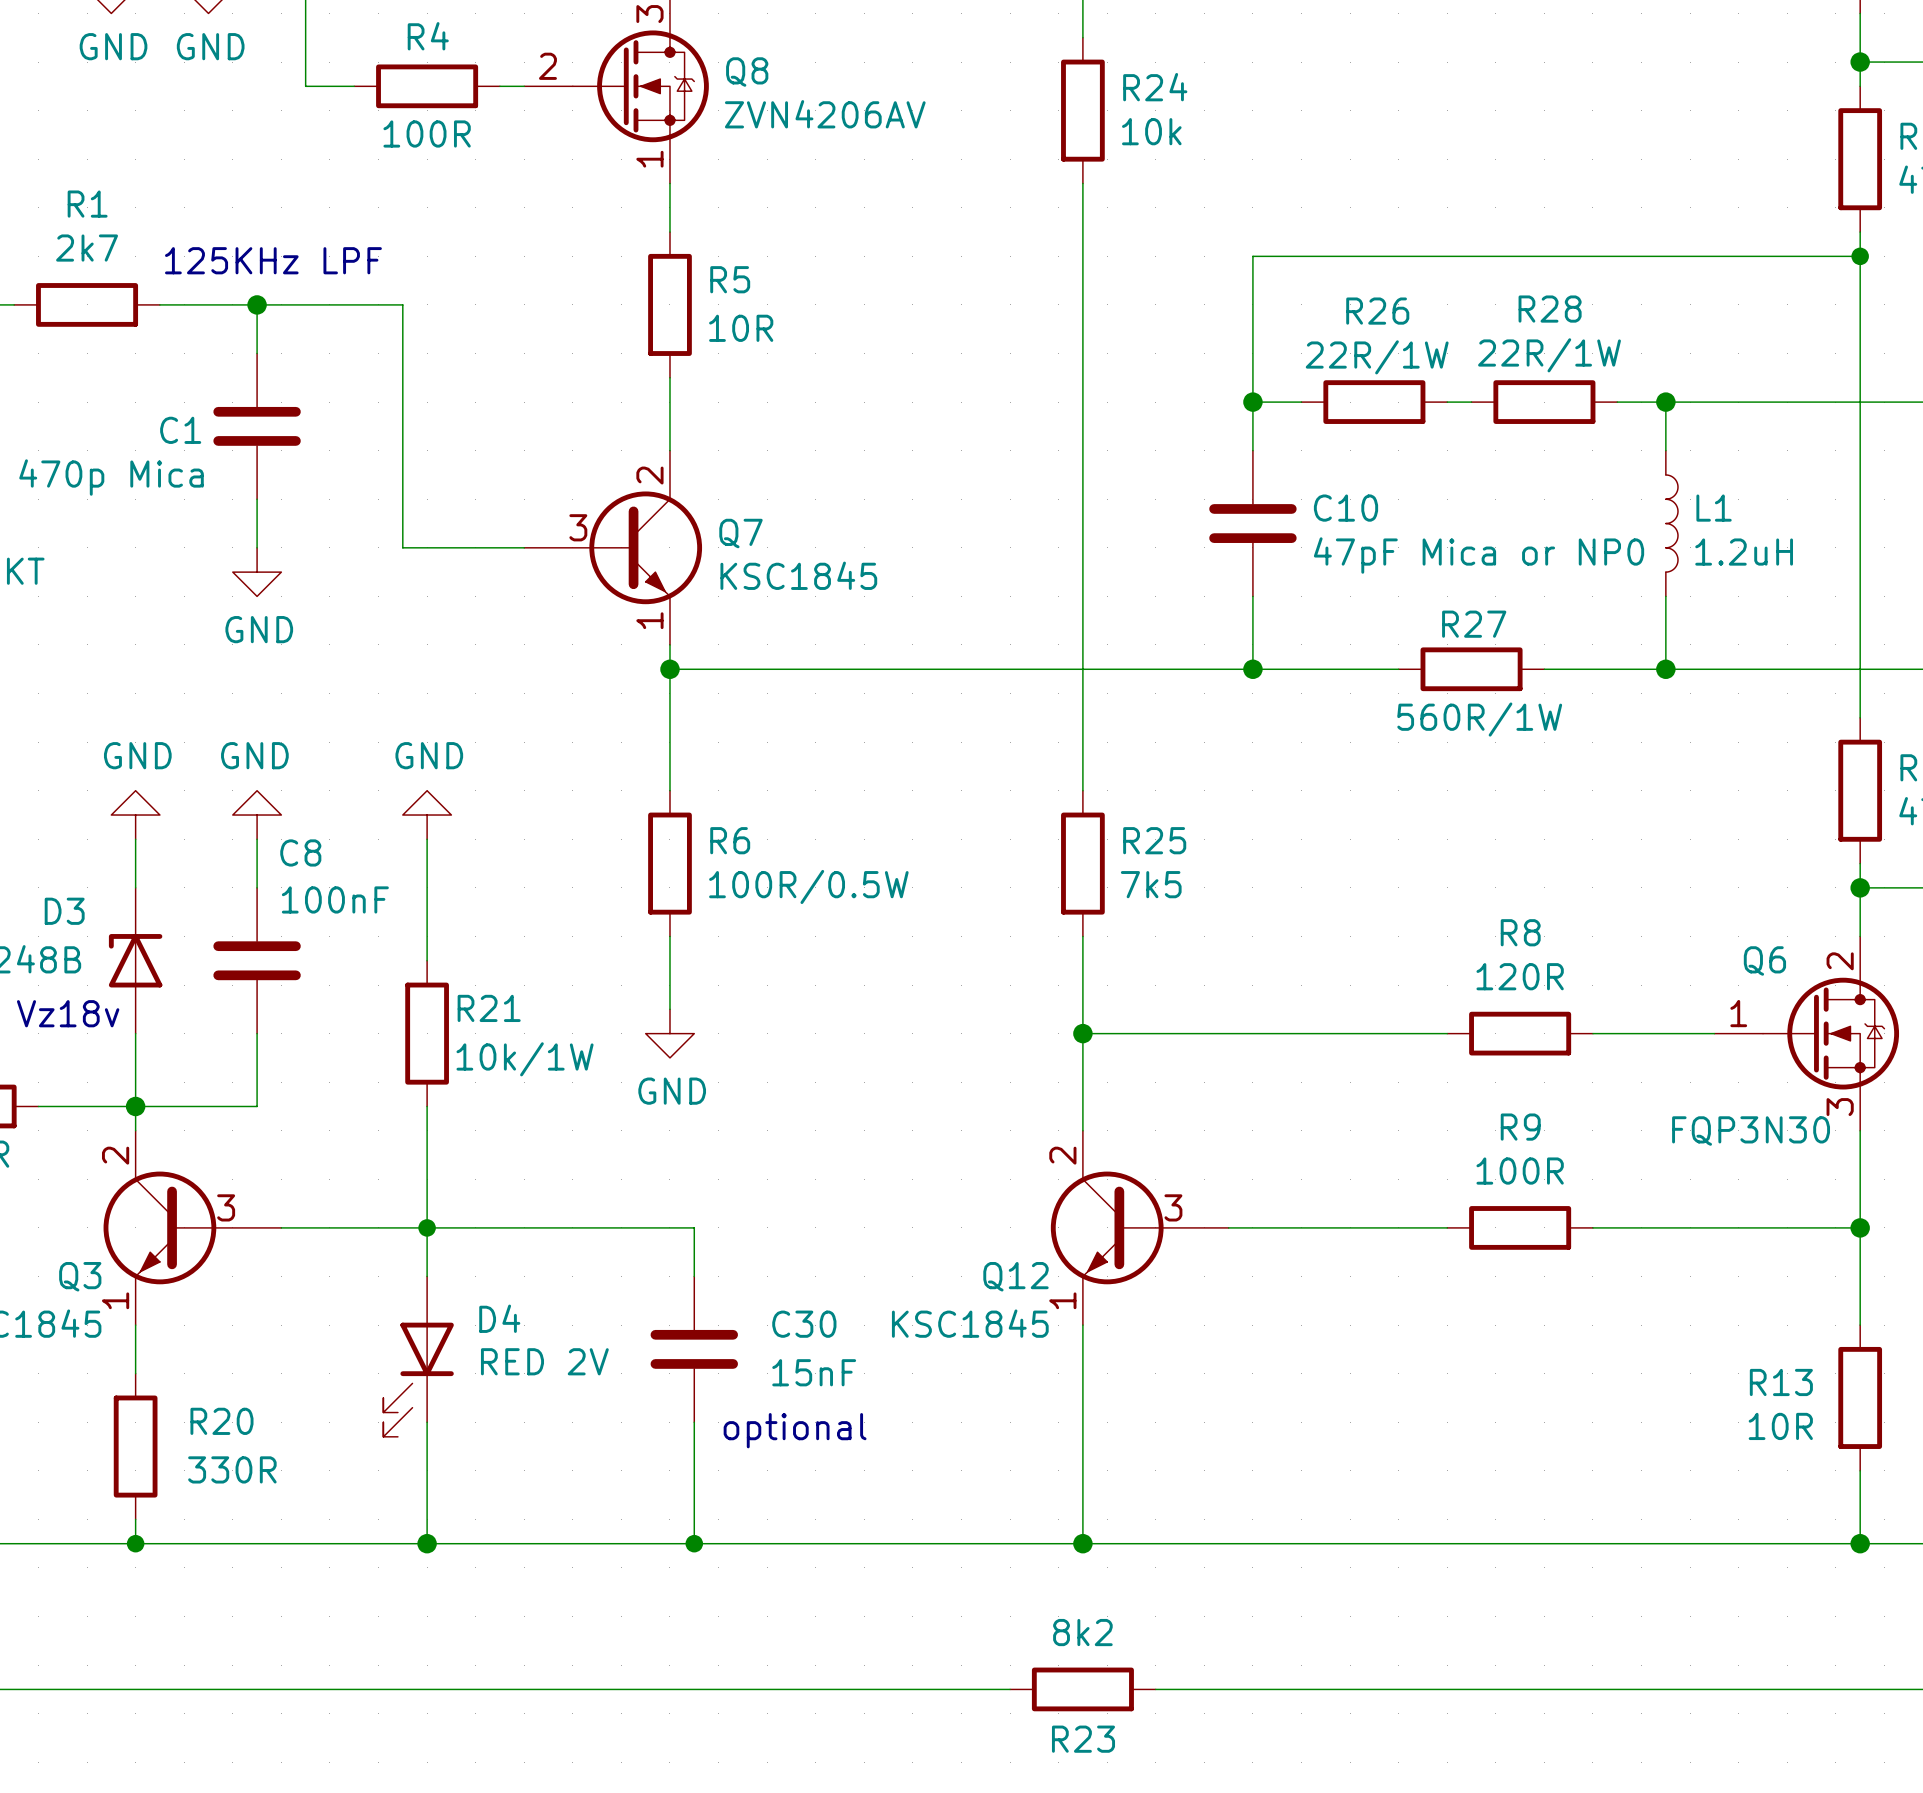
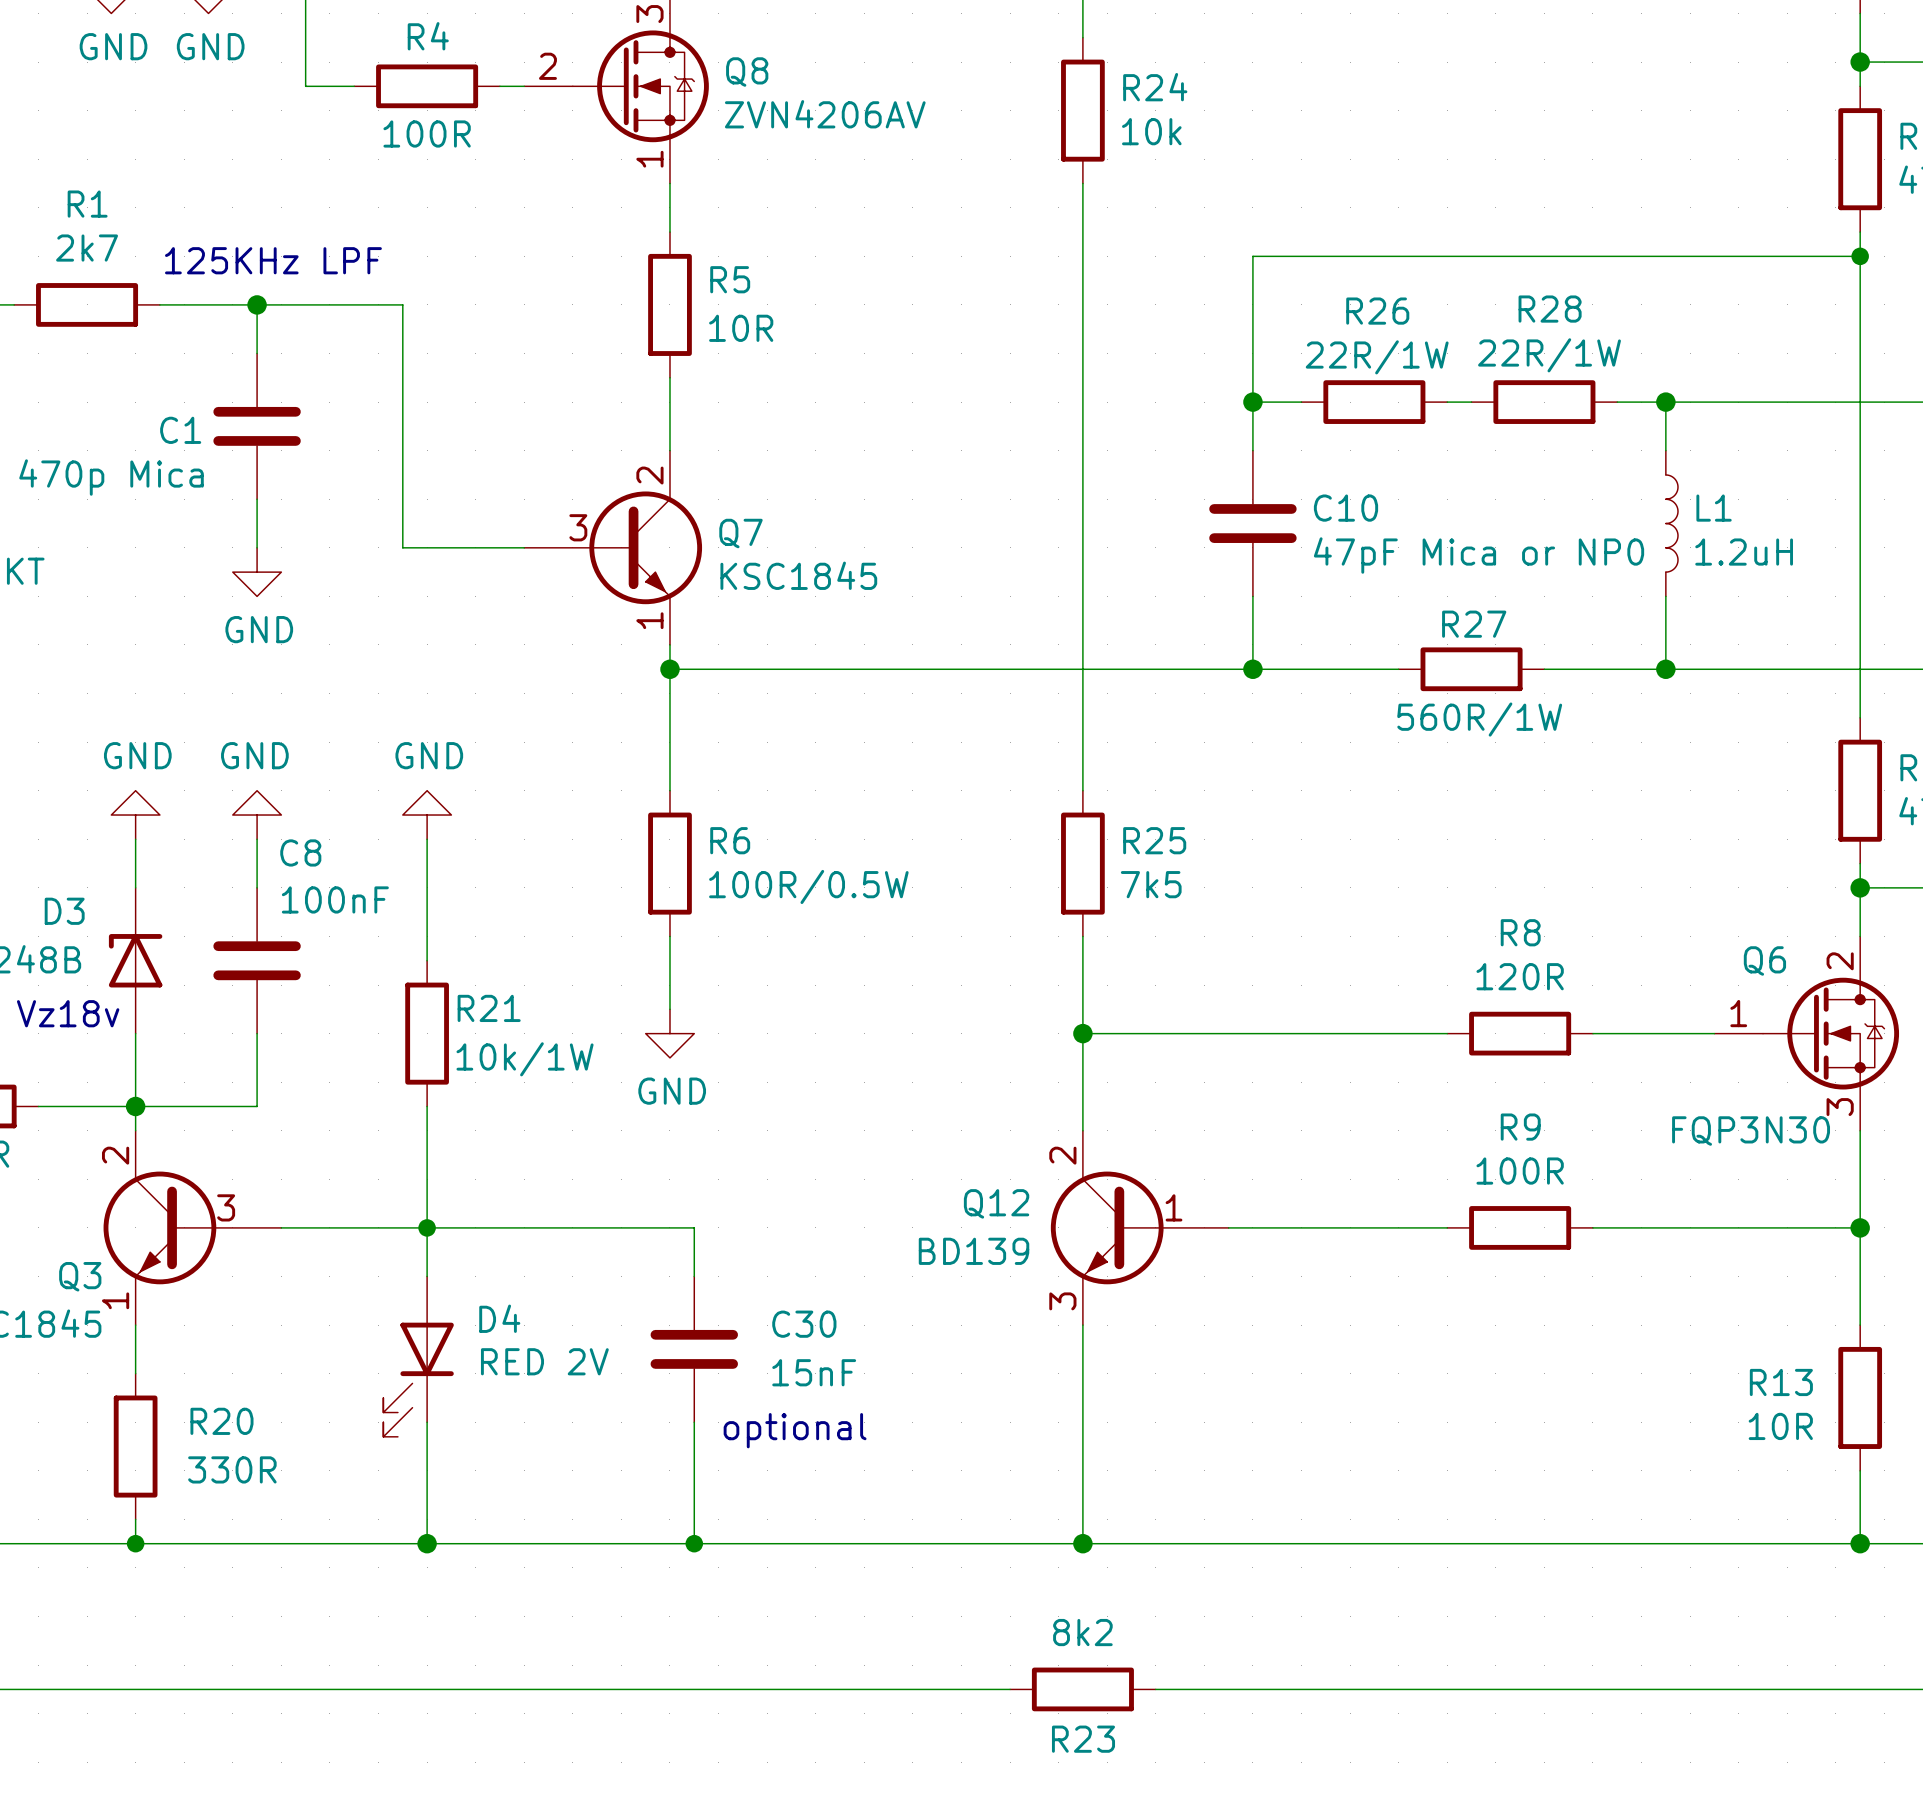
Q12 pin number: 3 (1173, 1207) -> 1 (1174, 1207)
Q12 name position: Q12 (1015, 1276) -> Q12 (996, 1203)
Q12 pin number: 1 (1062, 1300) -> 3 (1062, 1301)
Q12 value: KSC1845 (970, 1323) -> BD139 (974, 1251)

